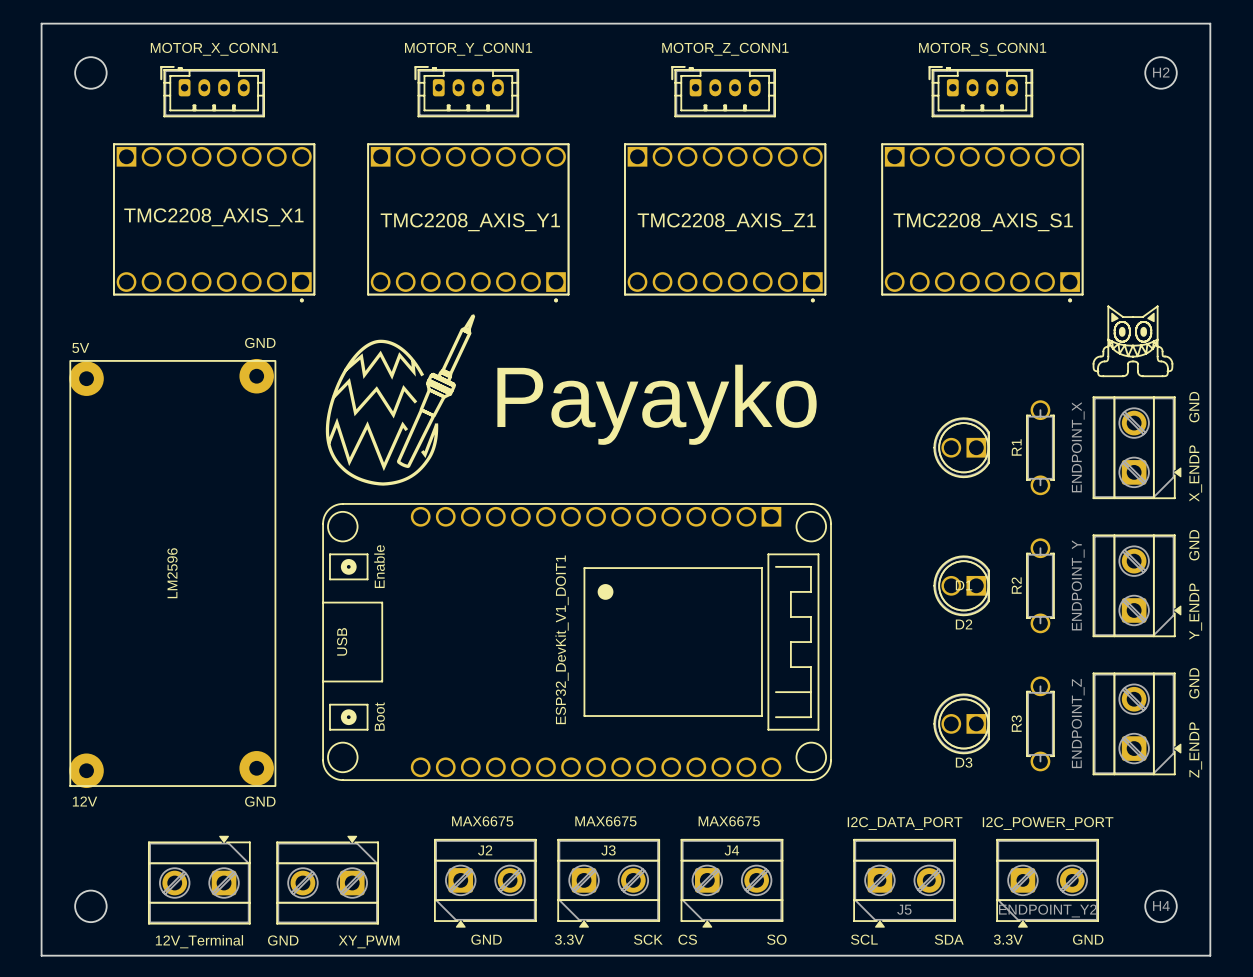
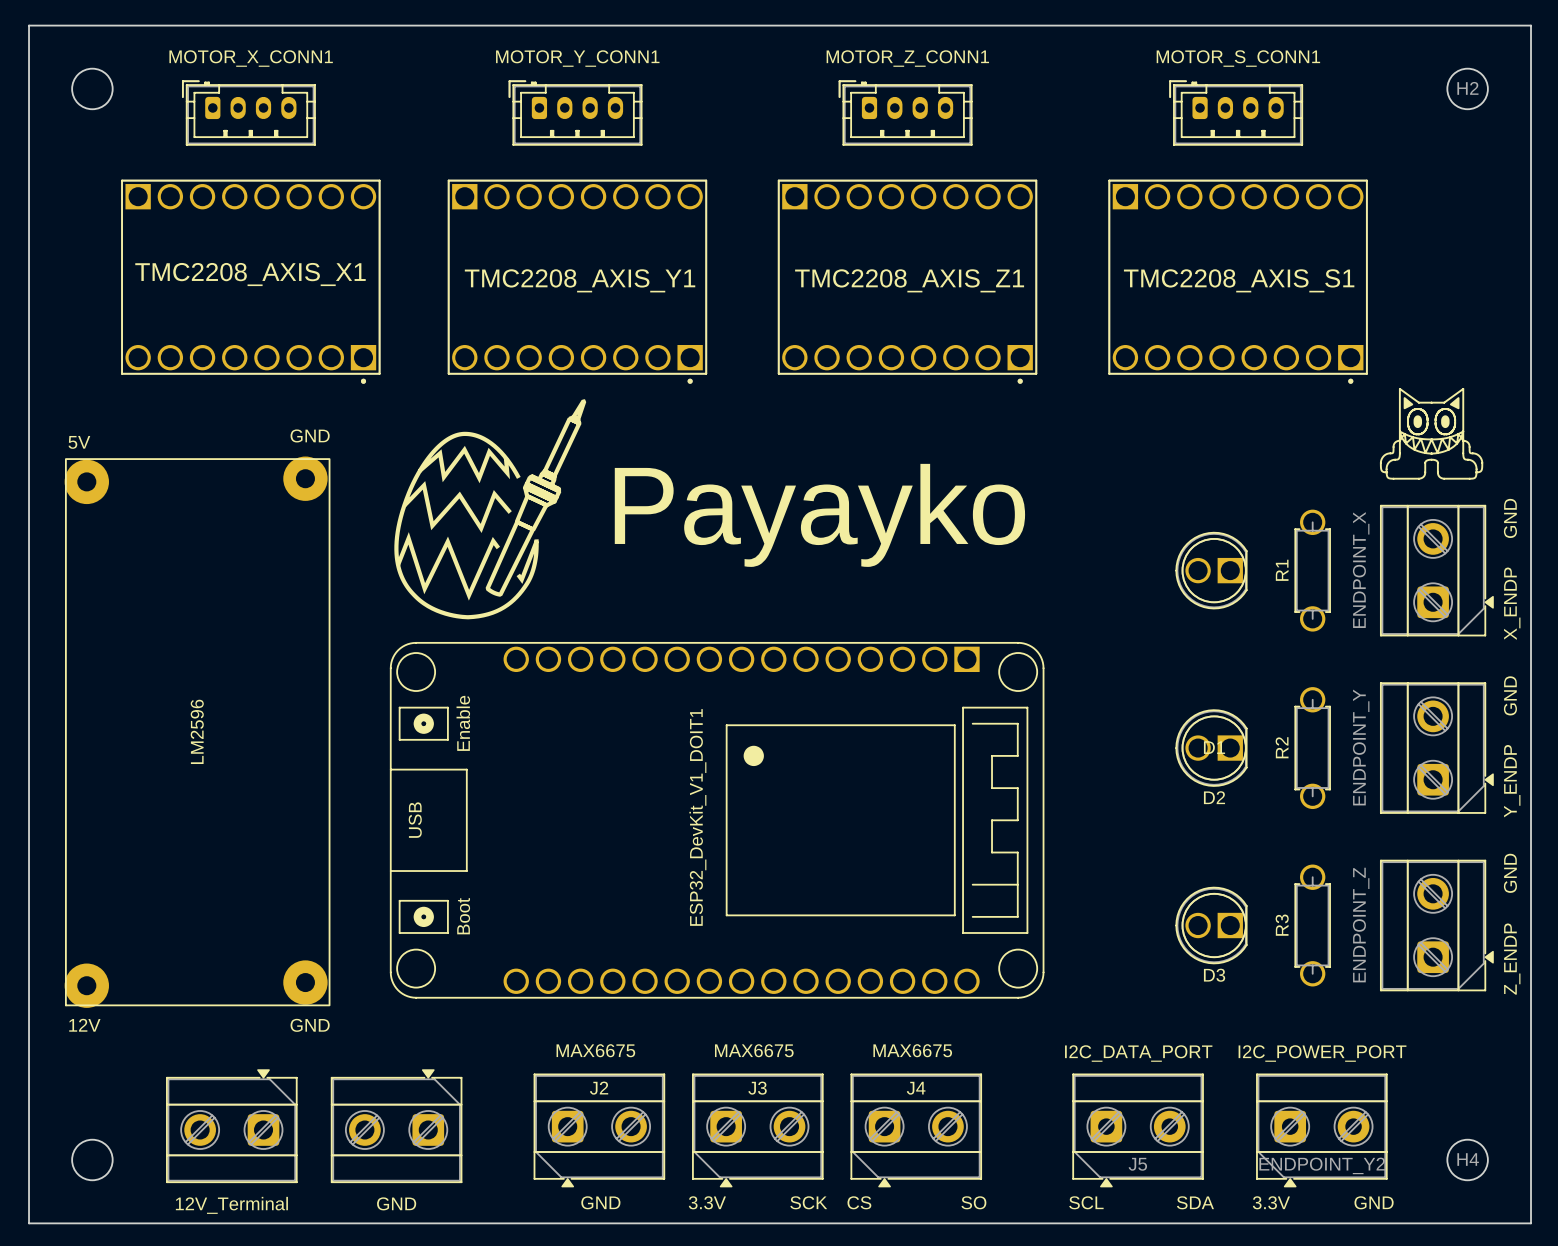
part text position: GND (283, 940) -> GND (396, 1203)
text: XY_PWM (369, 941) -> none

